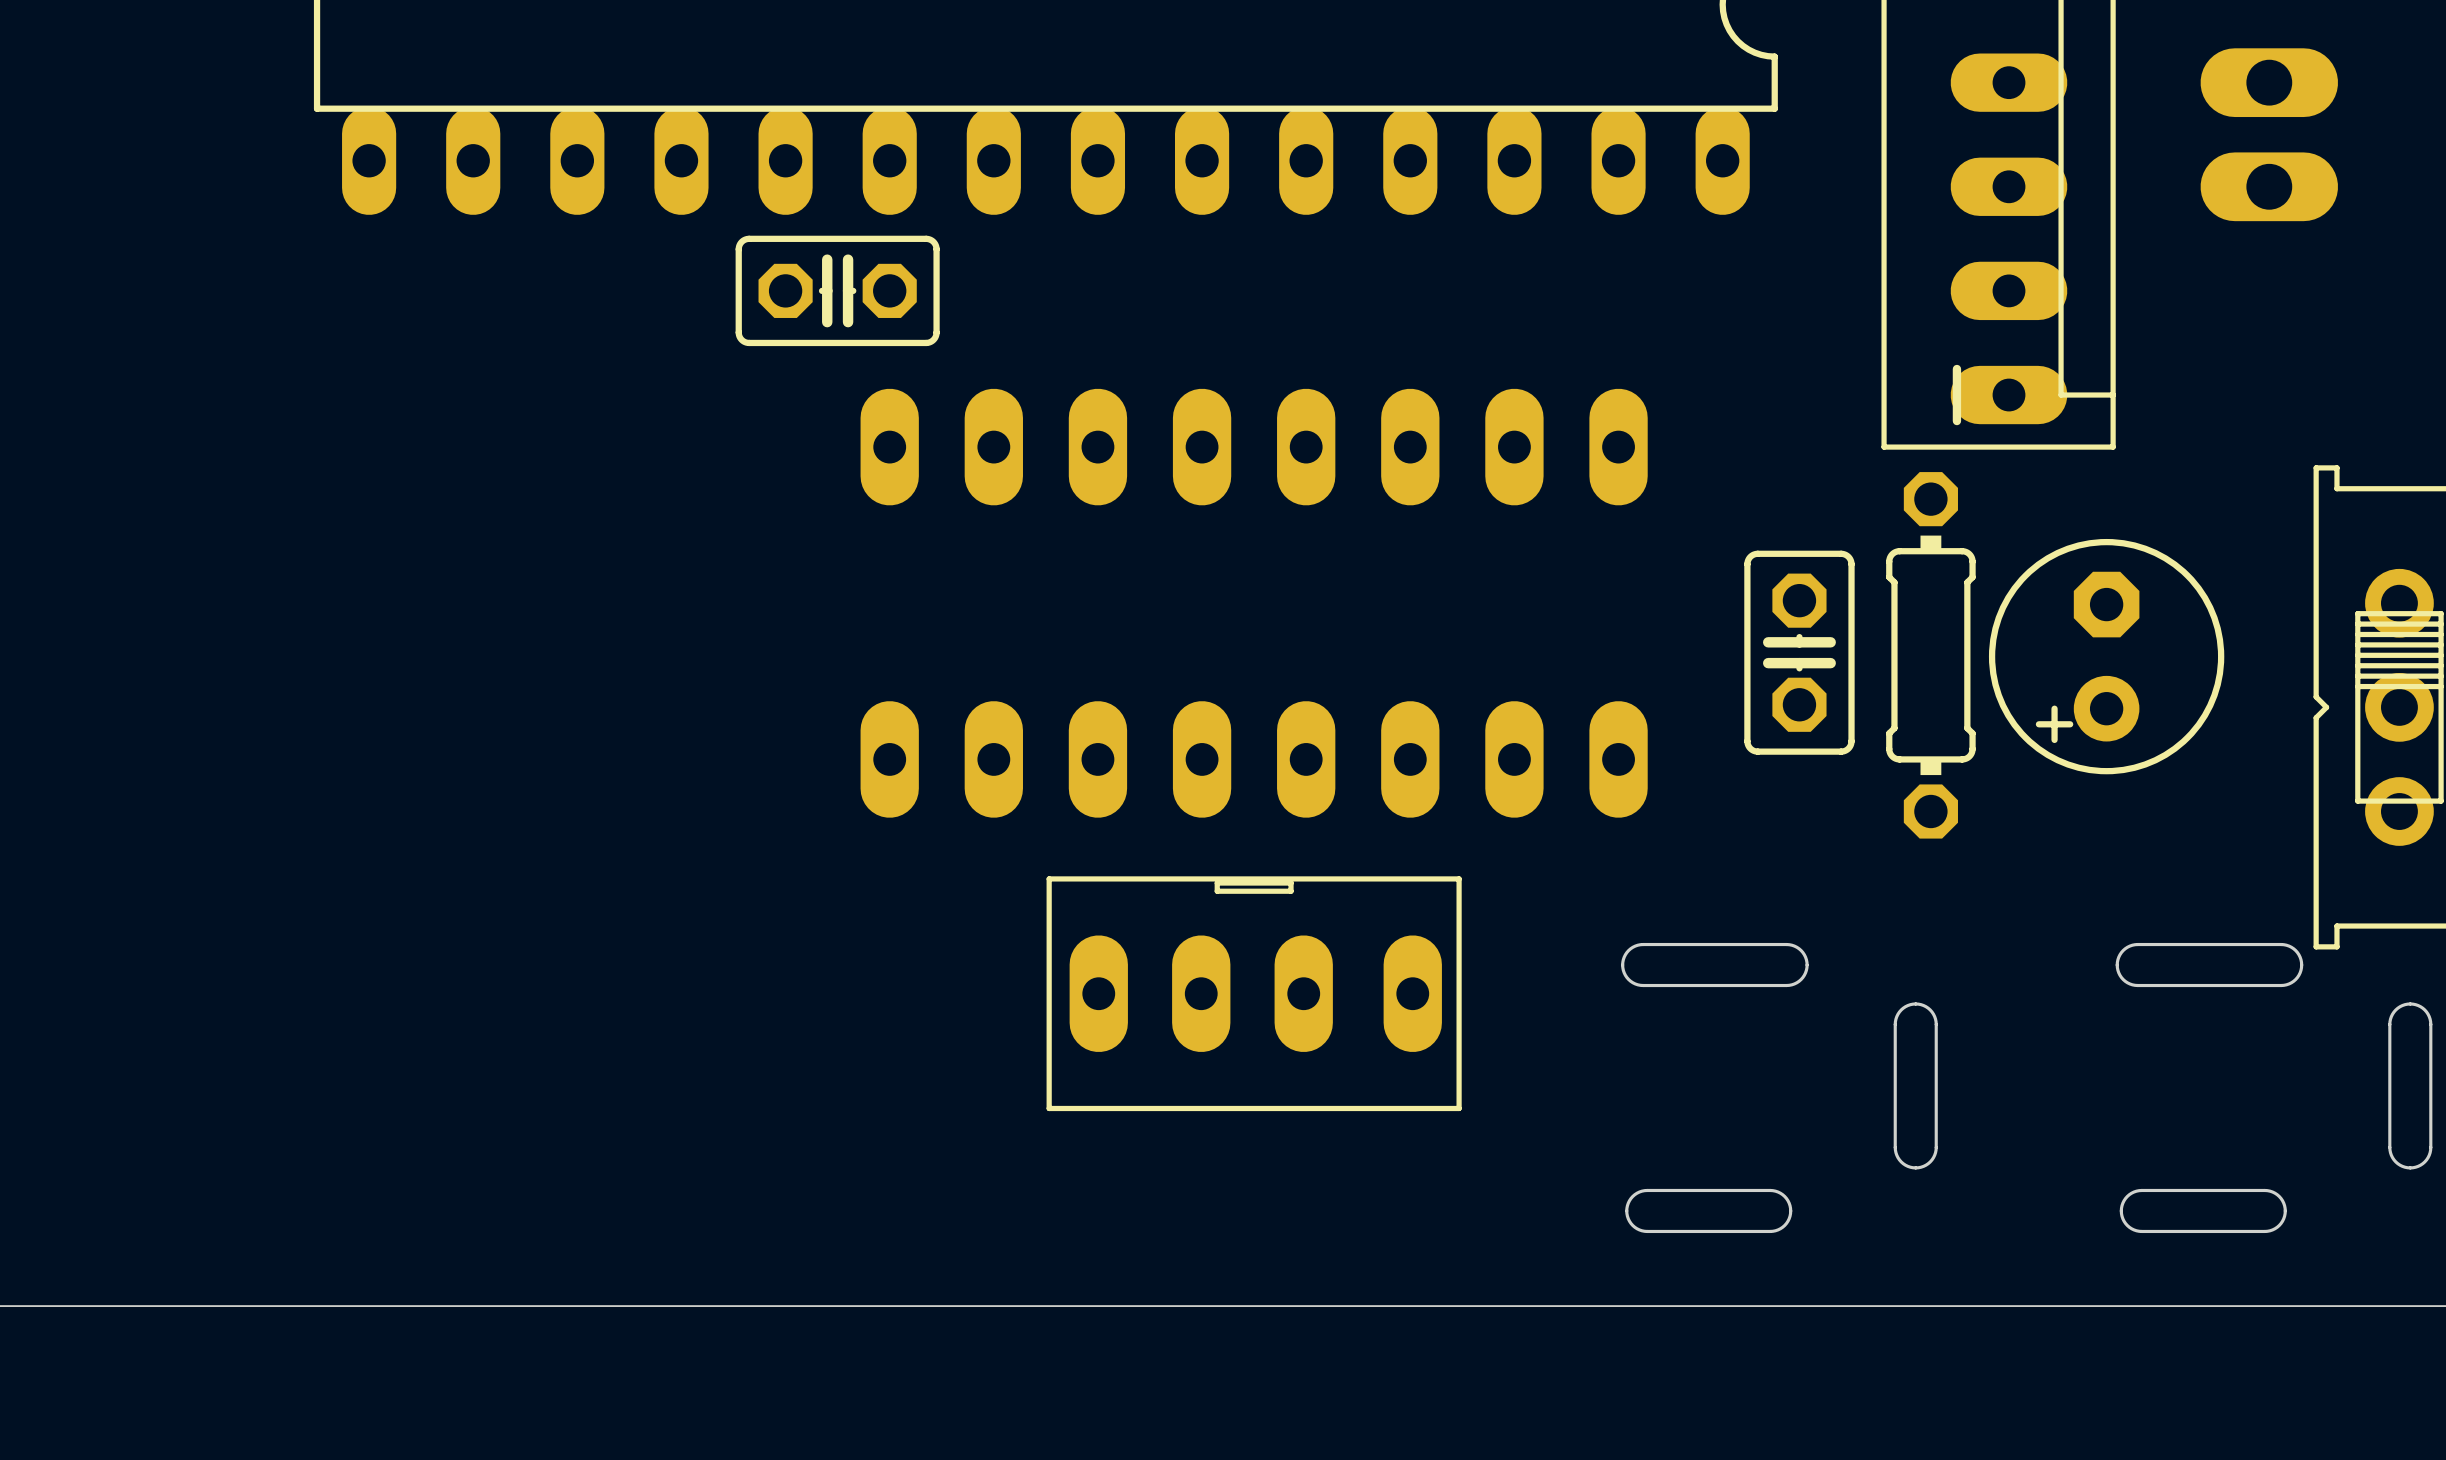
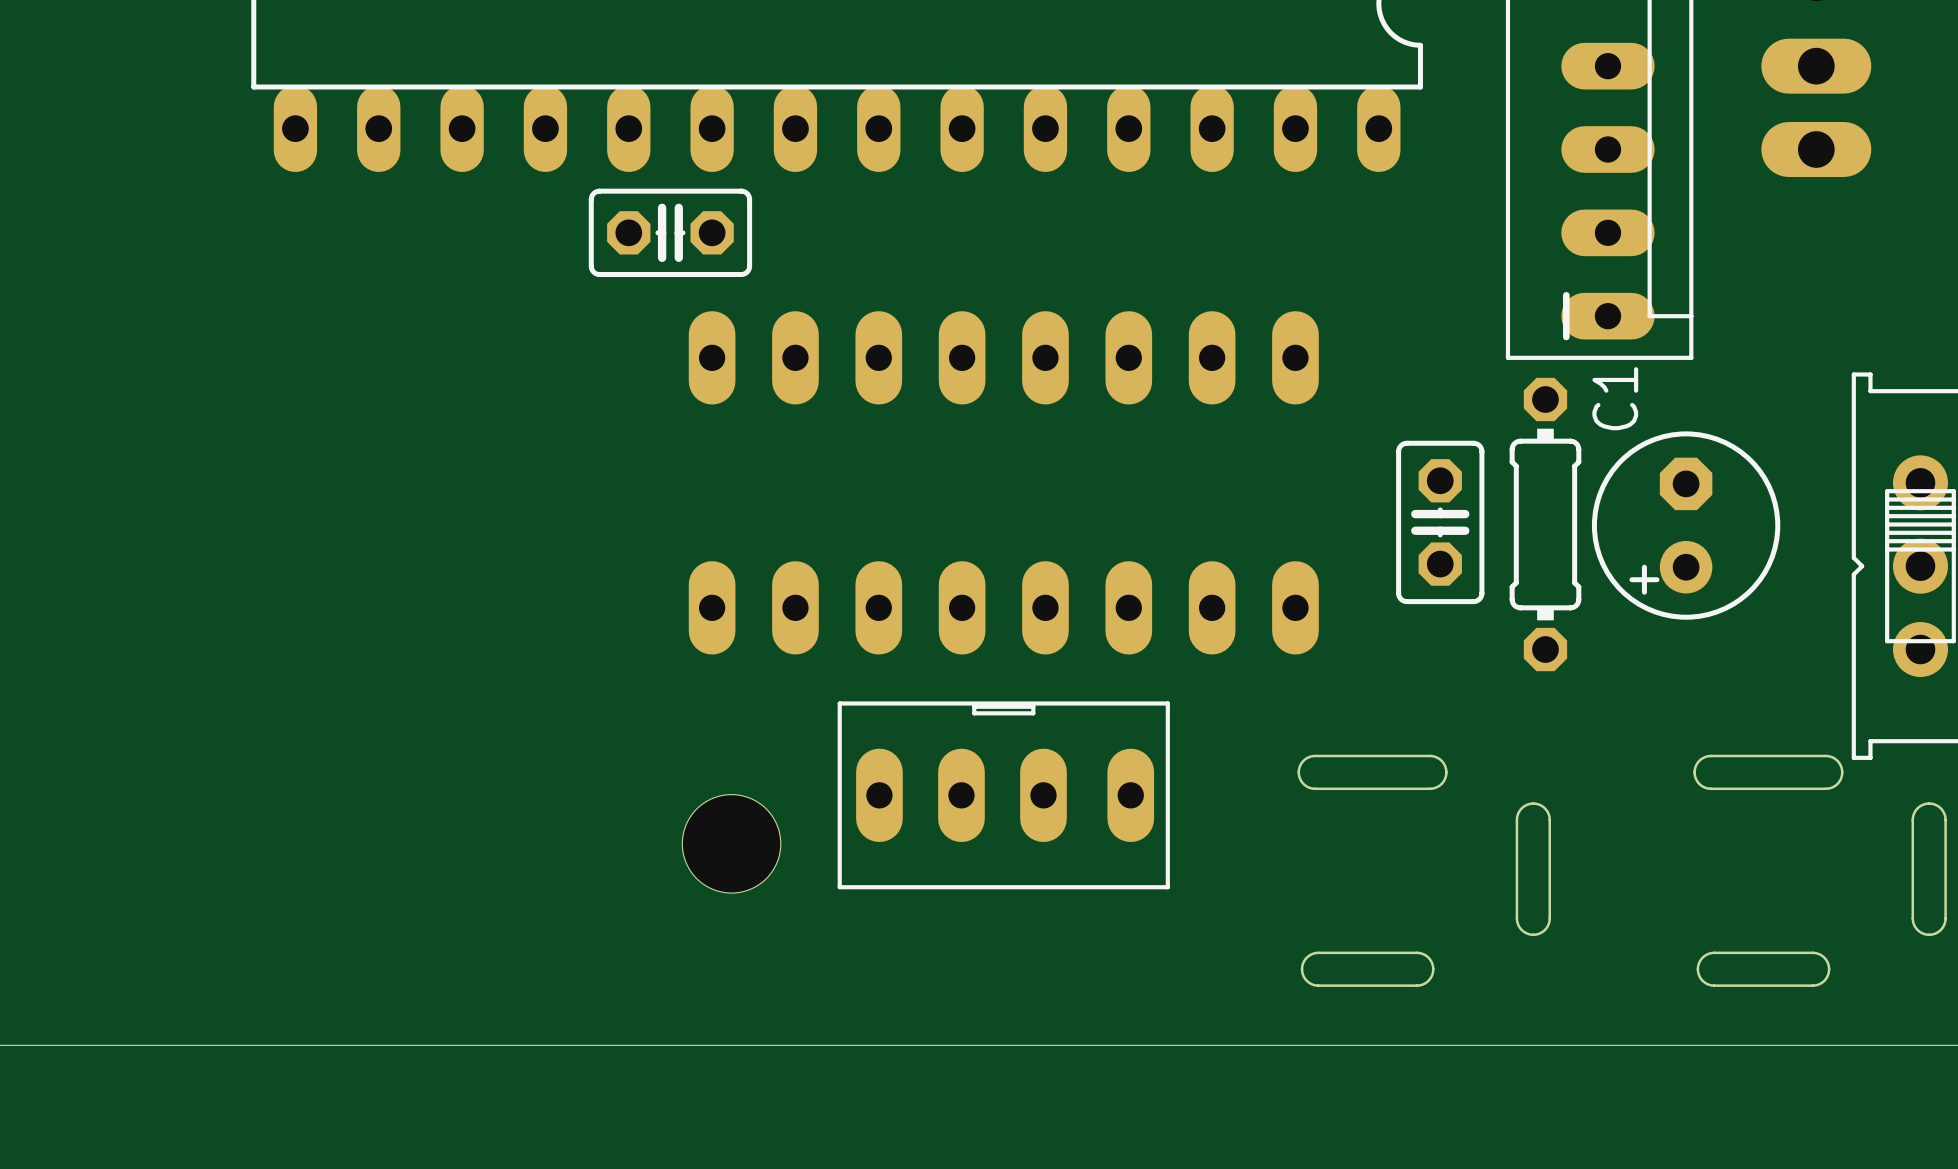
C1 name: none -> C1 (1615, 398)
hole: none -> (731, 843)

